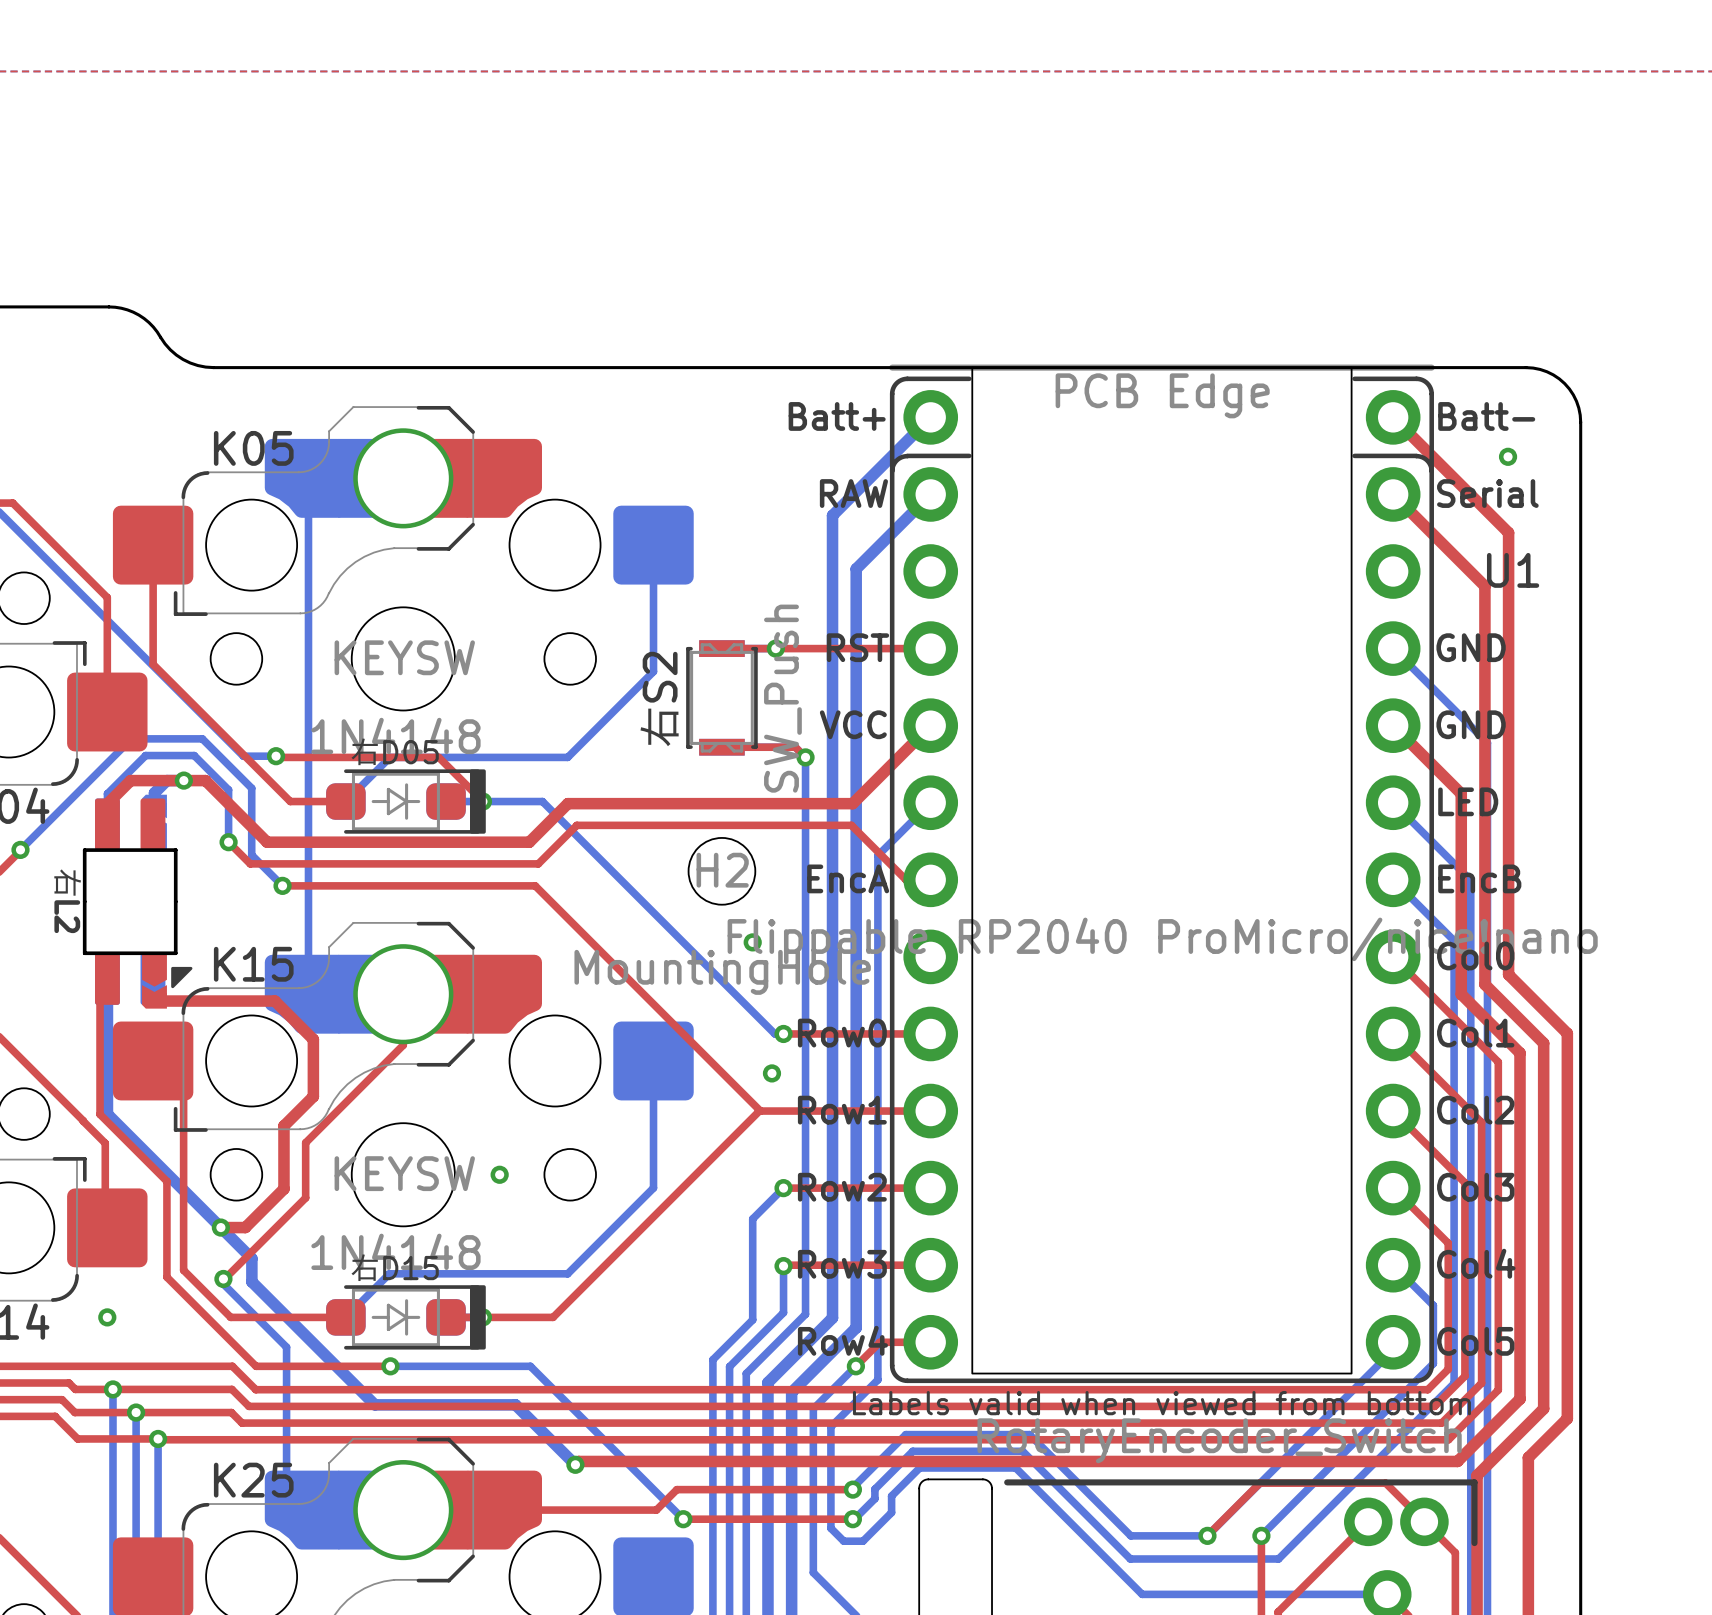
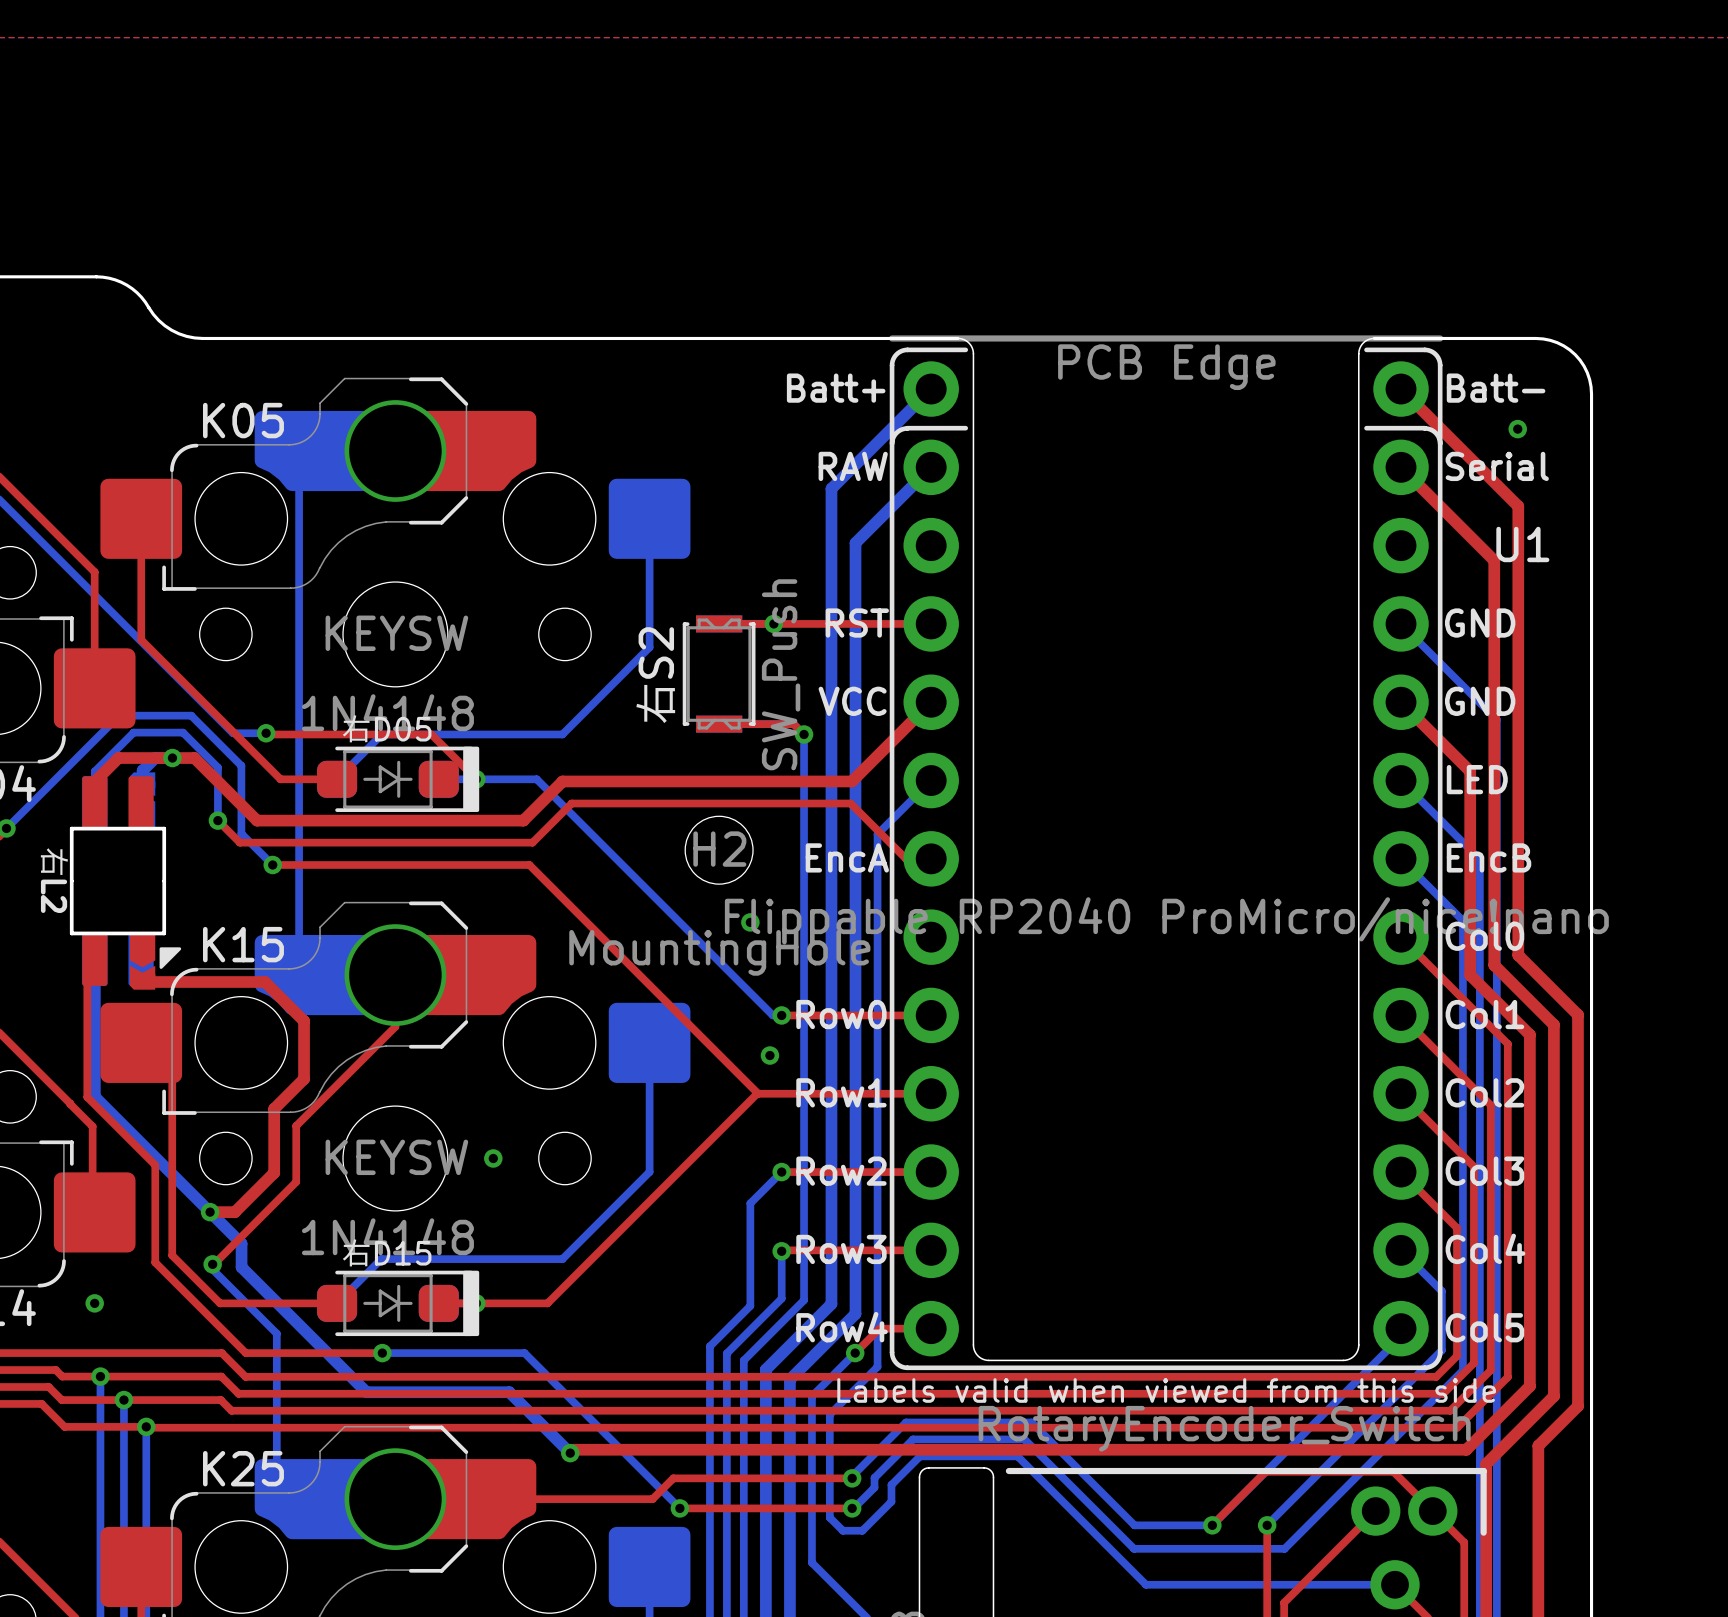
U1 footprint: [889, 364, 1435, 1384] -> [888, 335, 1444, 1371]
board edge: (957, 367) (1366, 367) -> none

